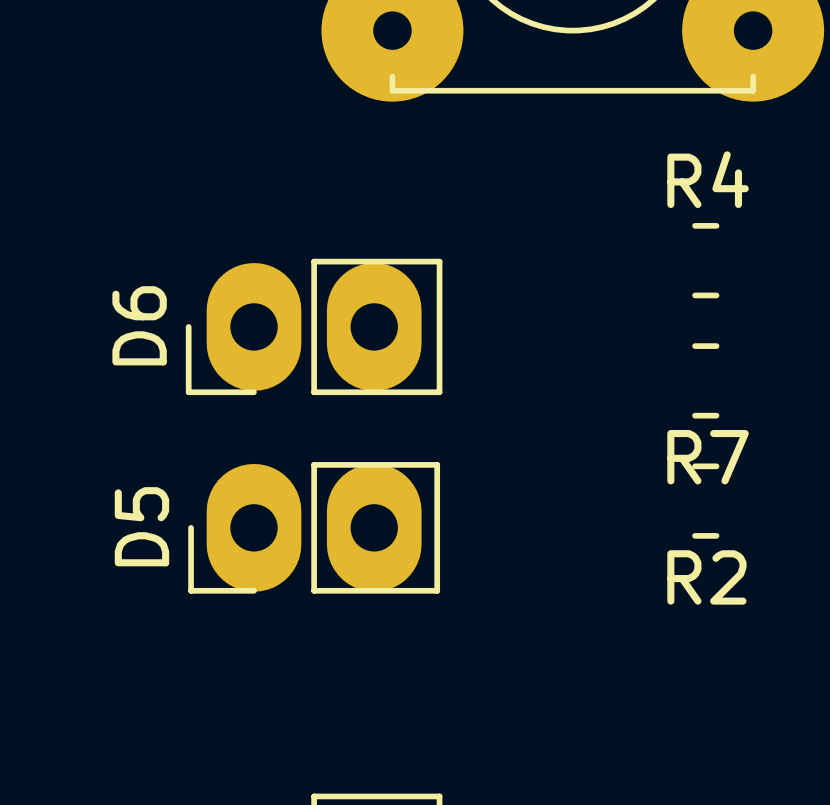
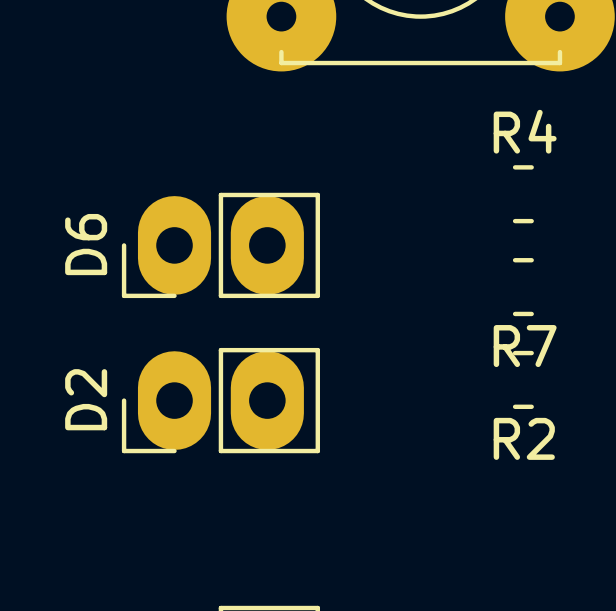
D5: (314, 527) -> none
D2: none -> (220, 400)

